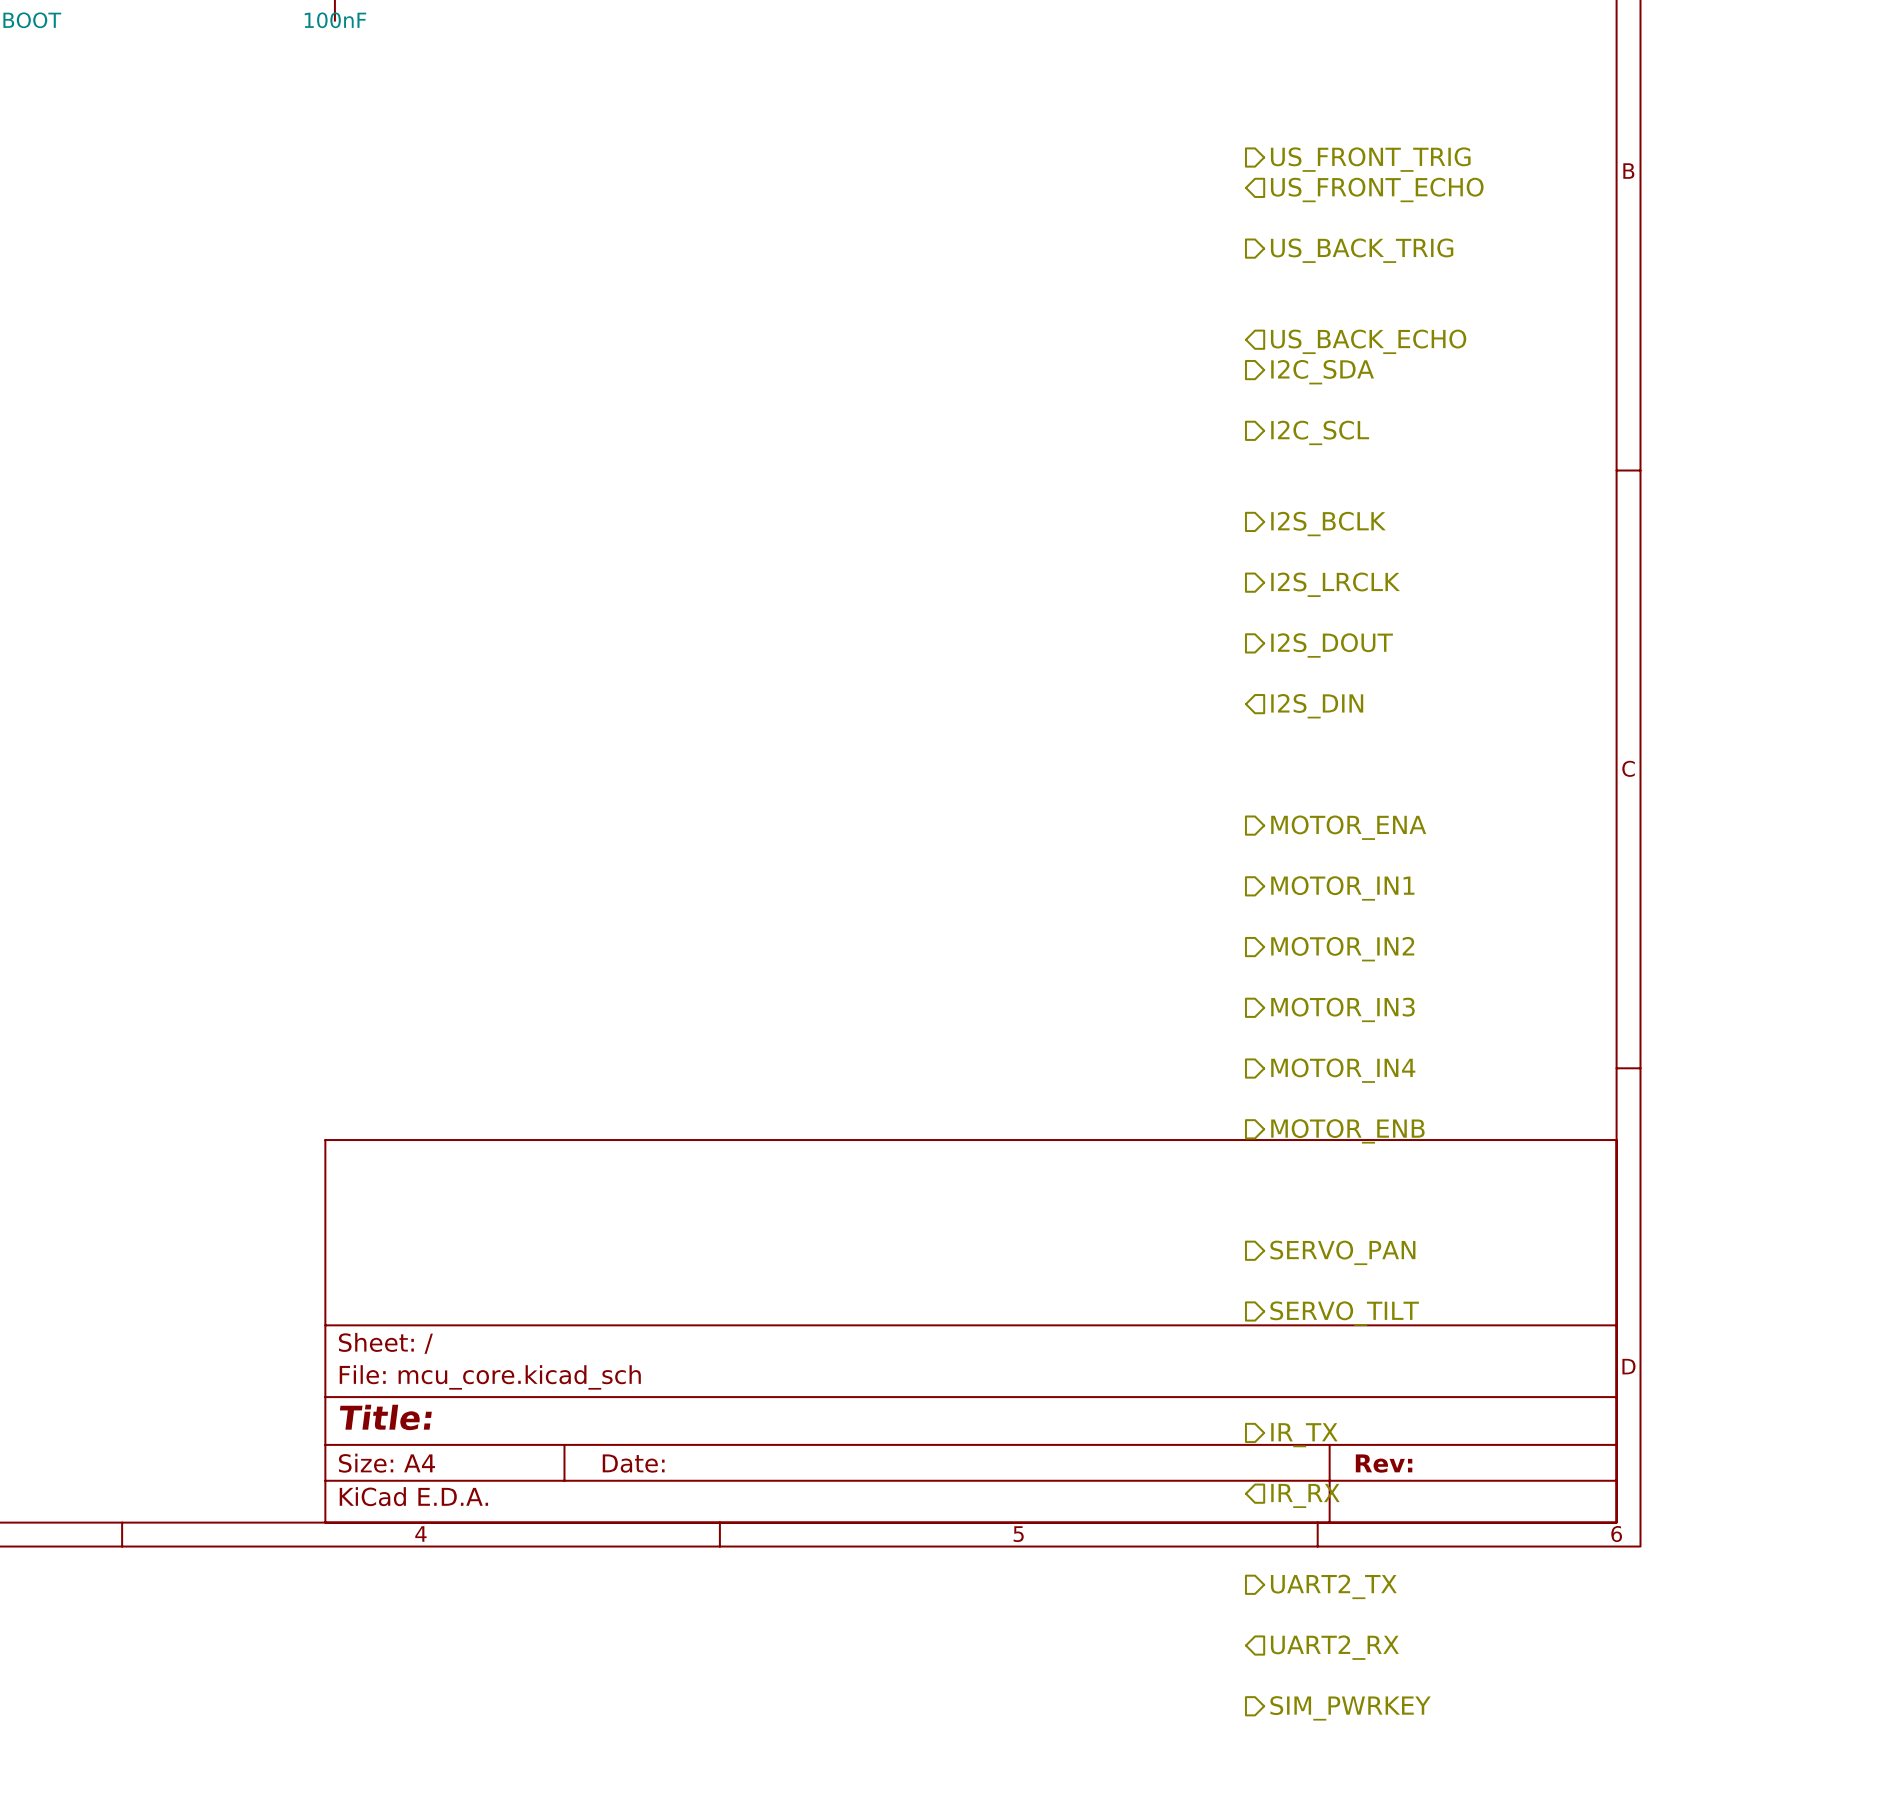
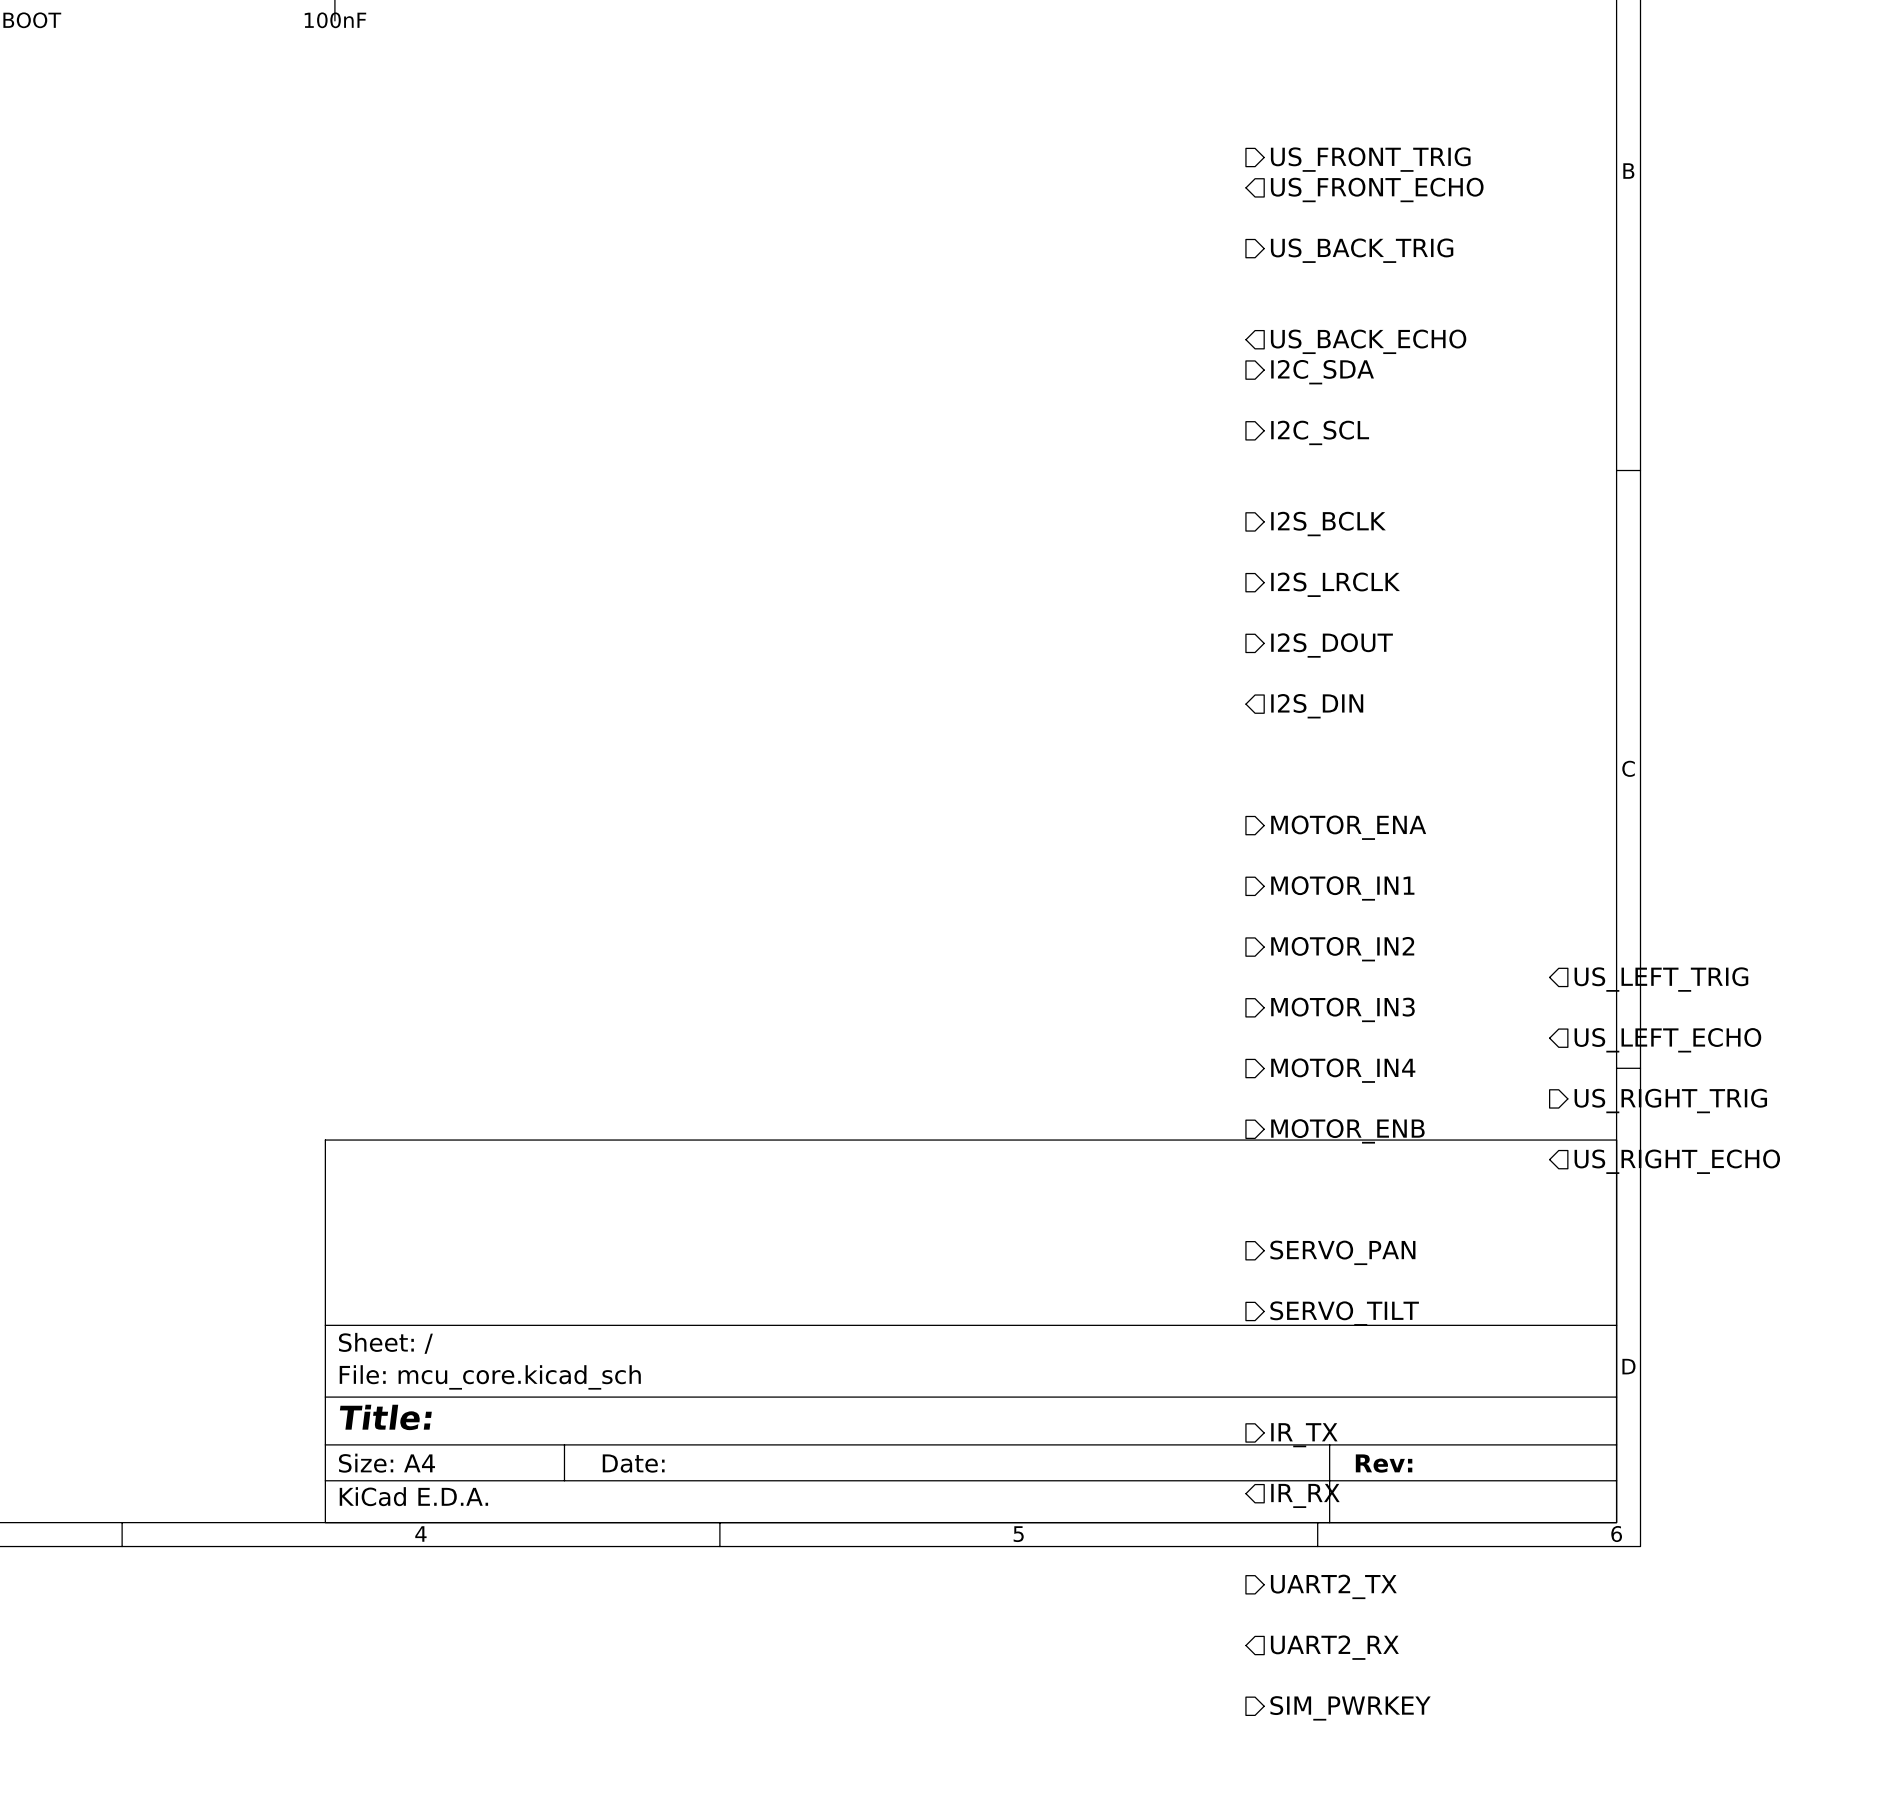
hierarchical label: none -> US_LEFT_TRIG (1661, 979)
hierarchical label: none -> US_LEFT_ECHO (1667, 1040)
hierarchical label: none -> US_RIGHT_TRIG (1670, 1101)
hierarchical label: none -> US_RIGHT_ECHO (1677, 1161)

